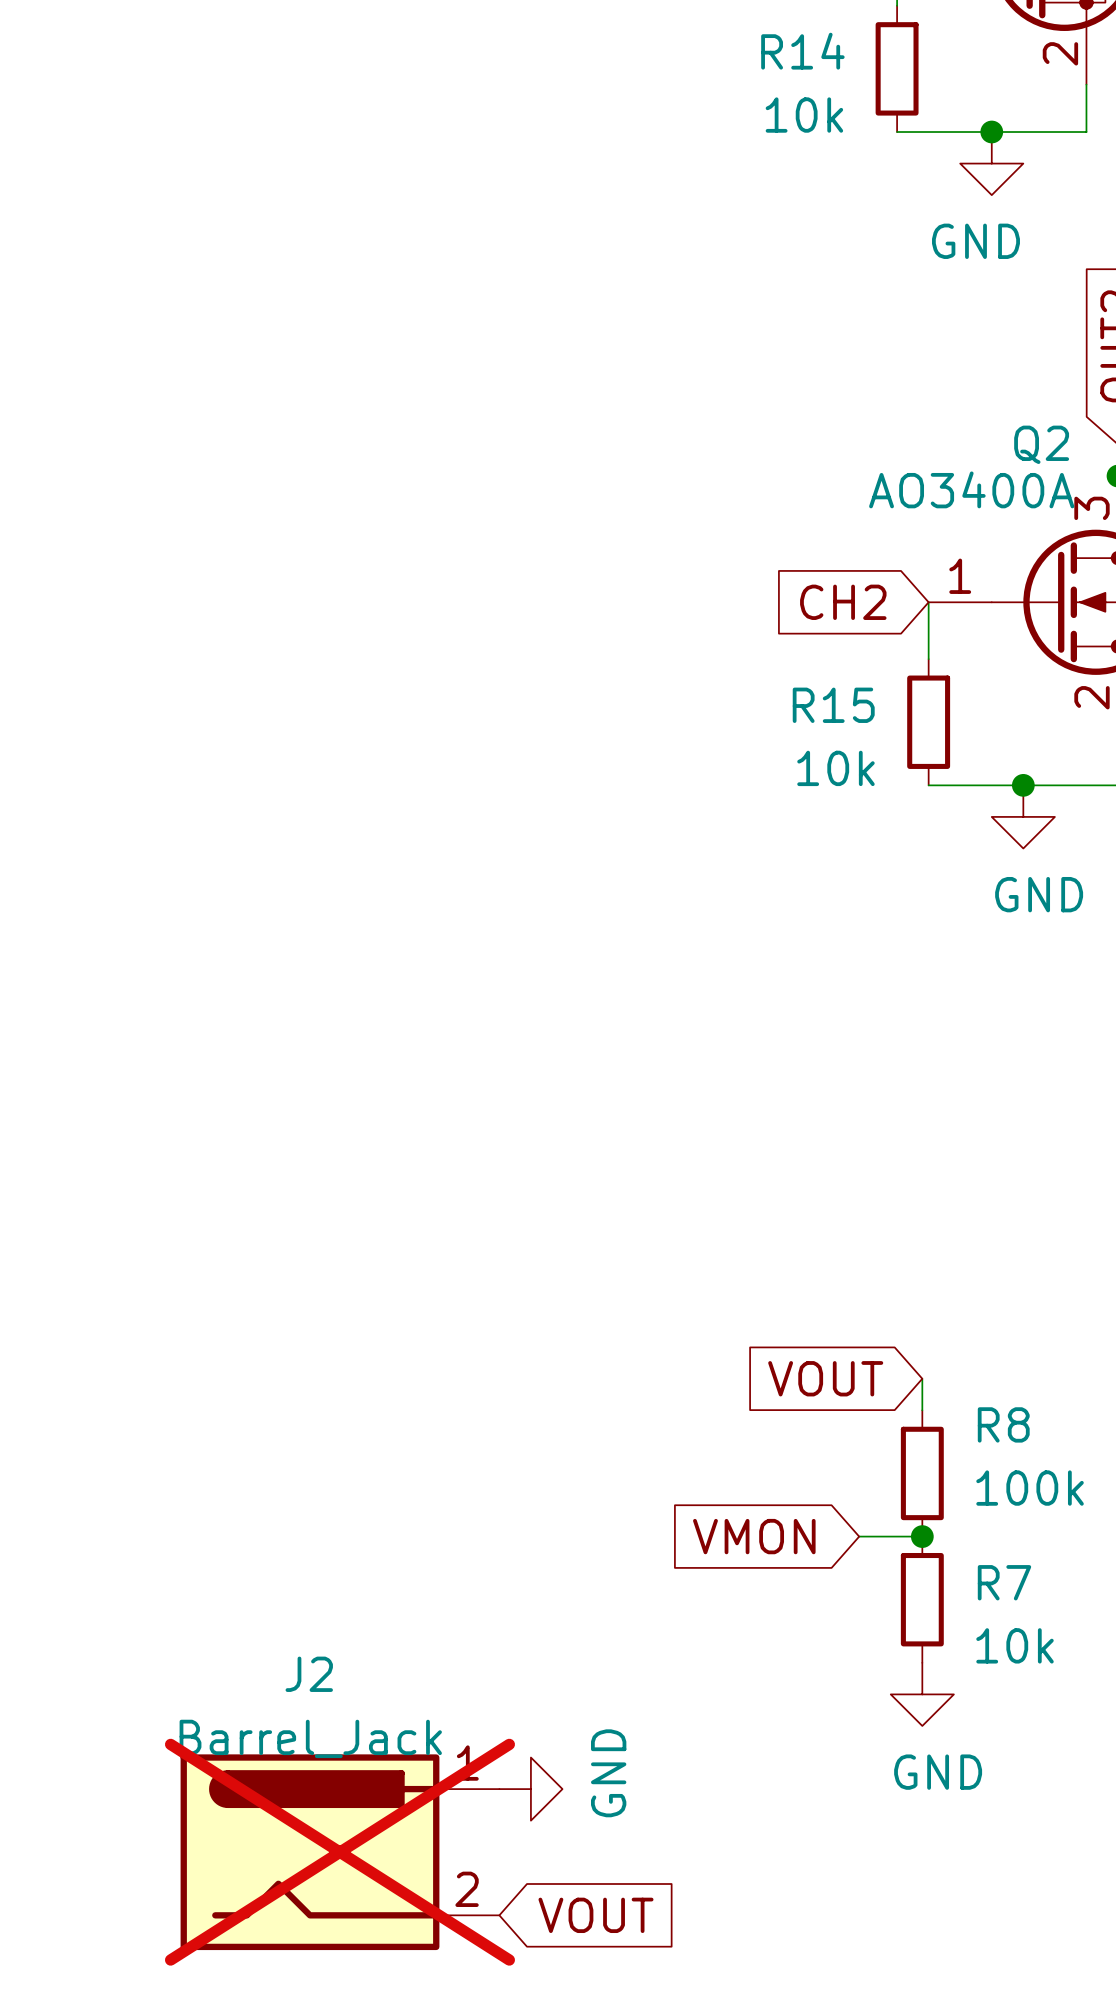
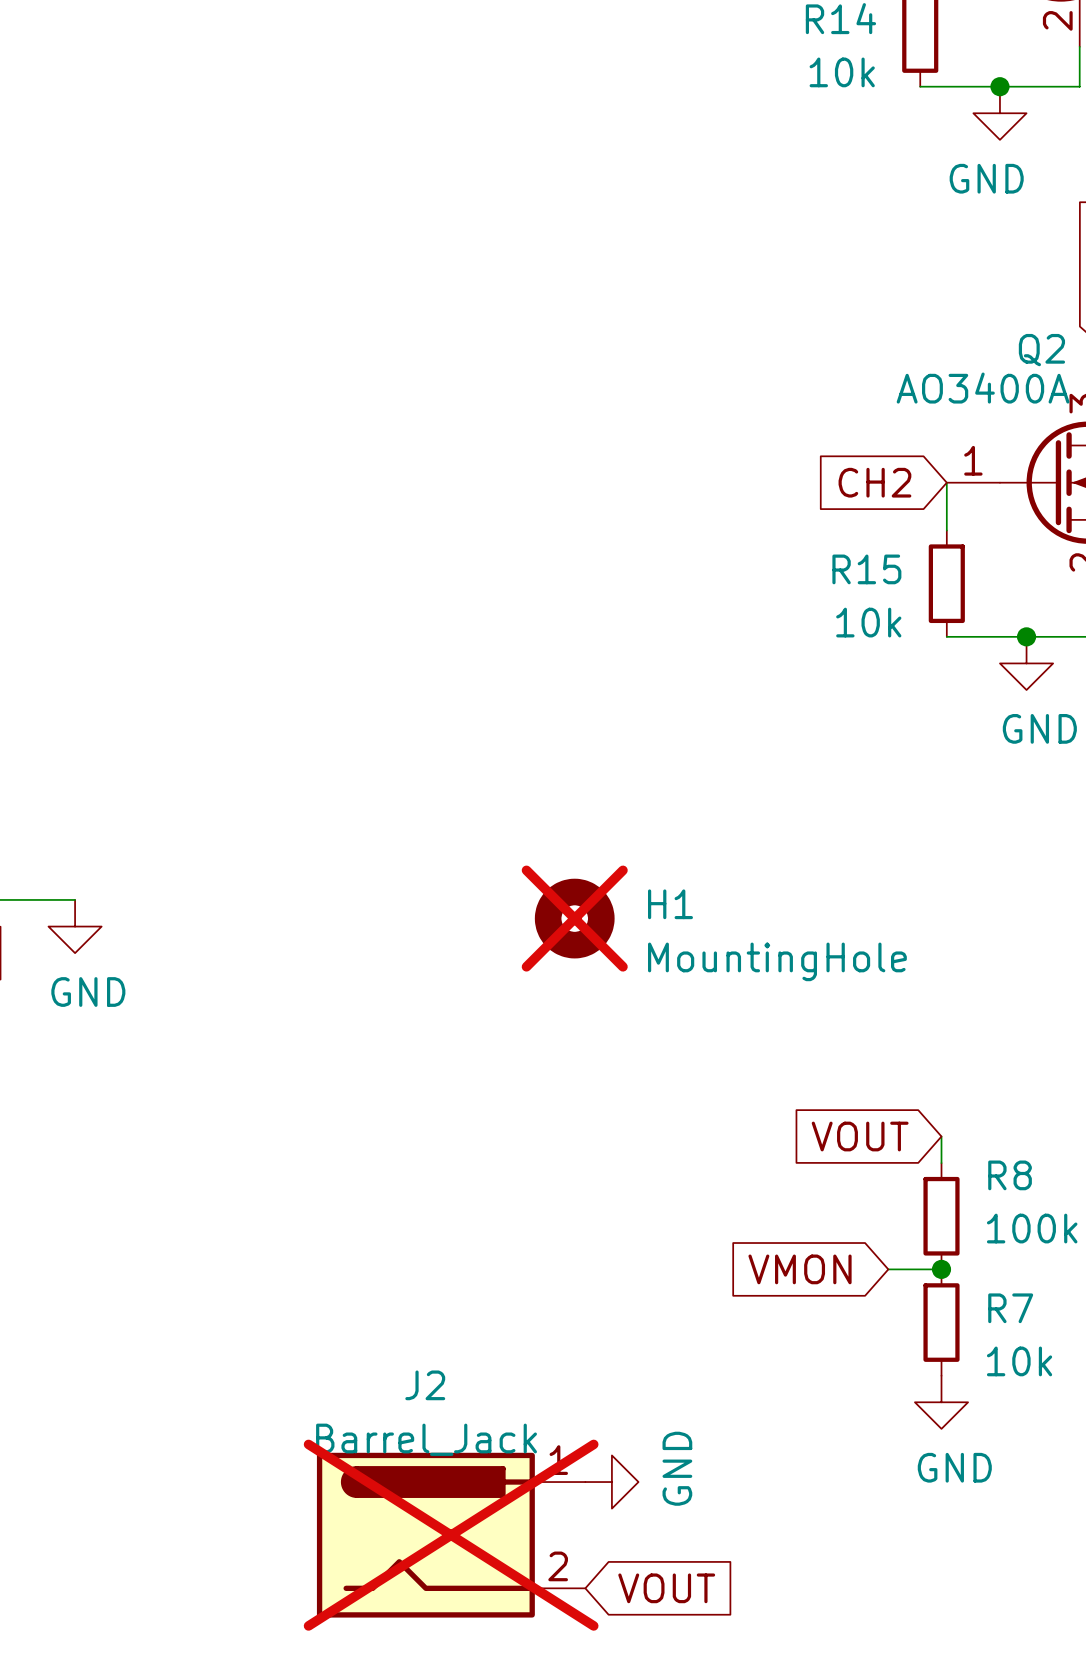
H1: none -> MountingHole (574, 918)

